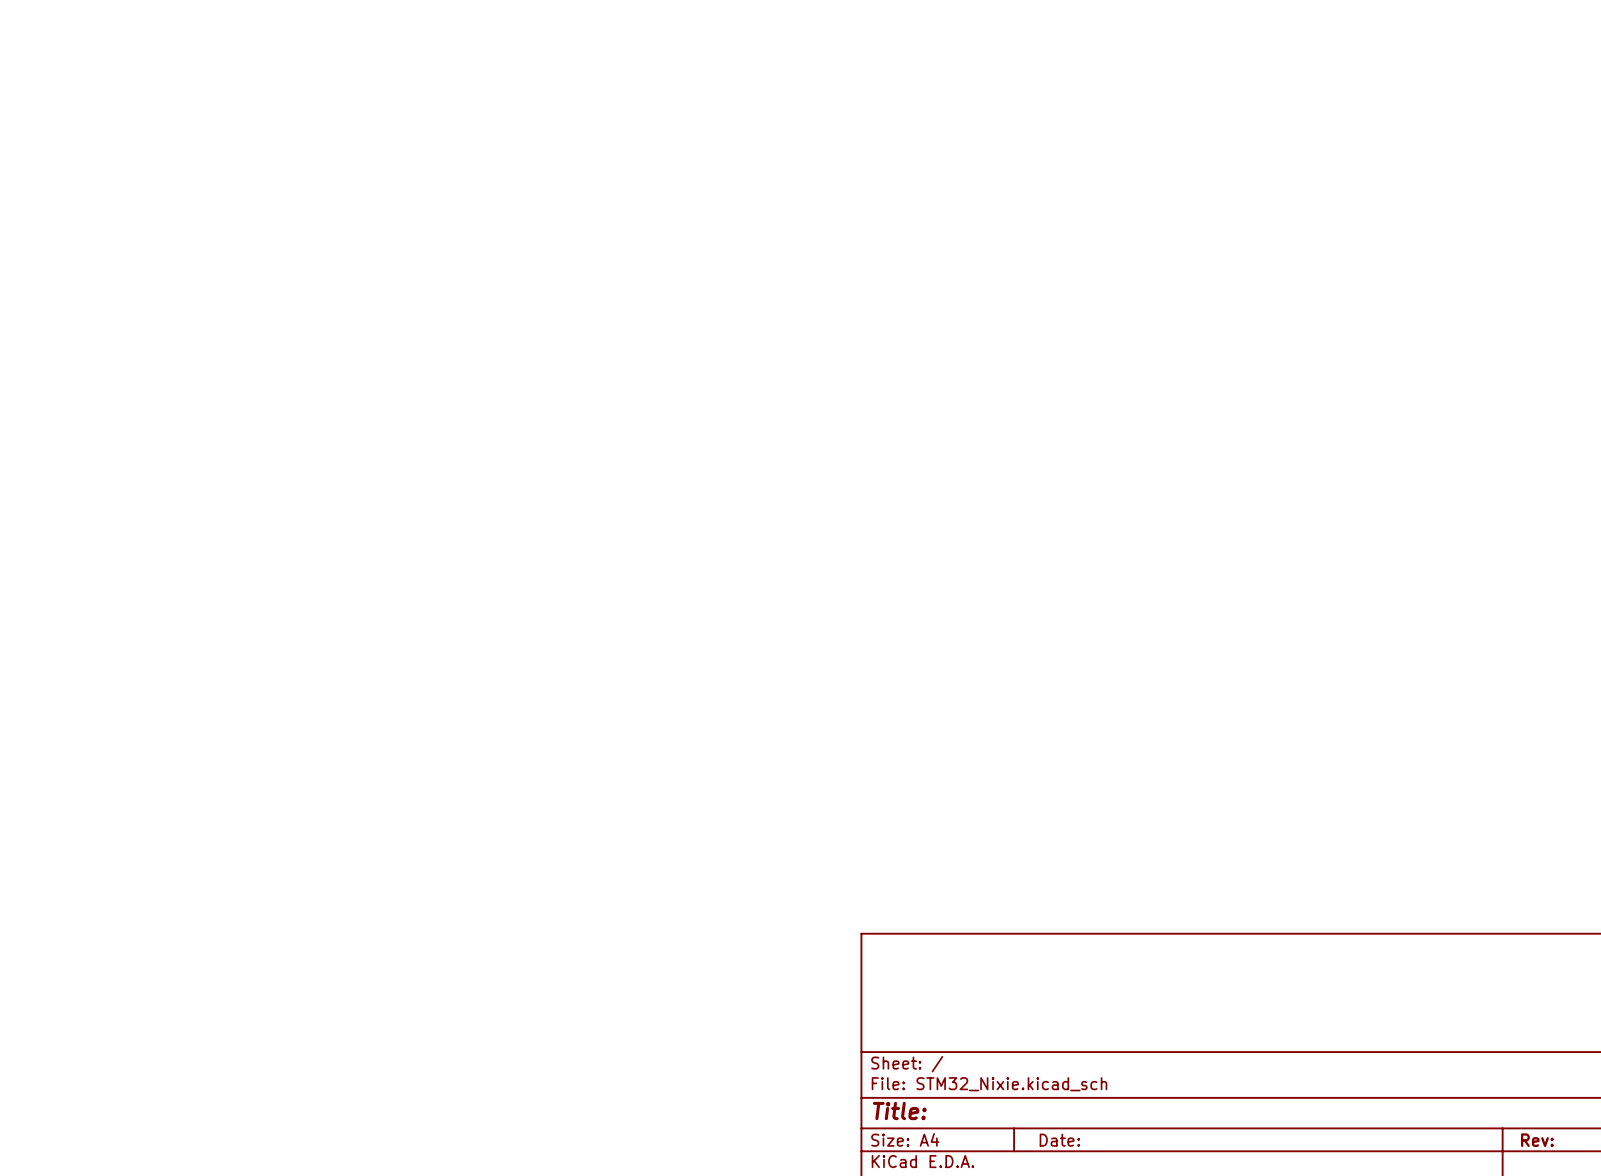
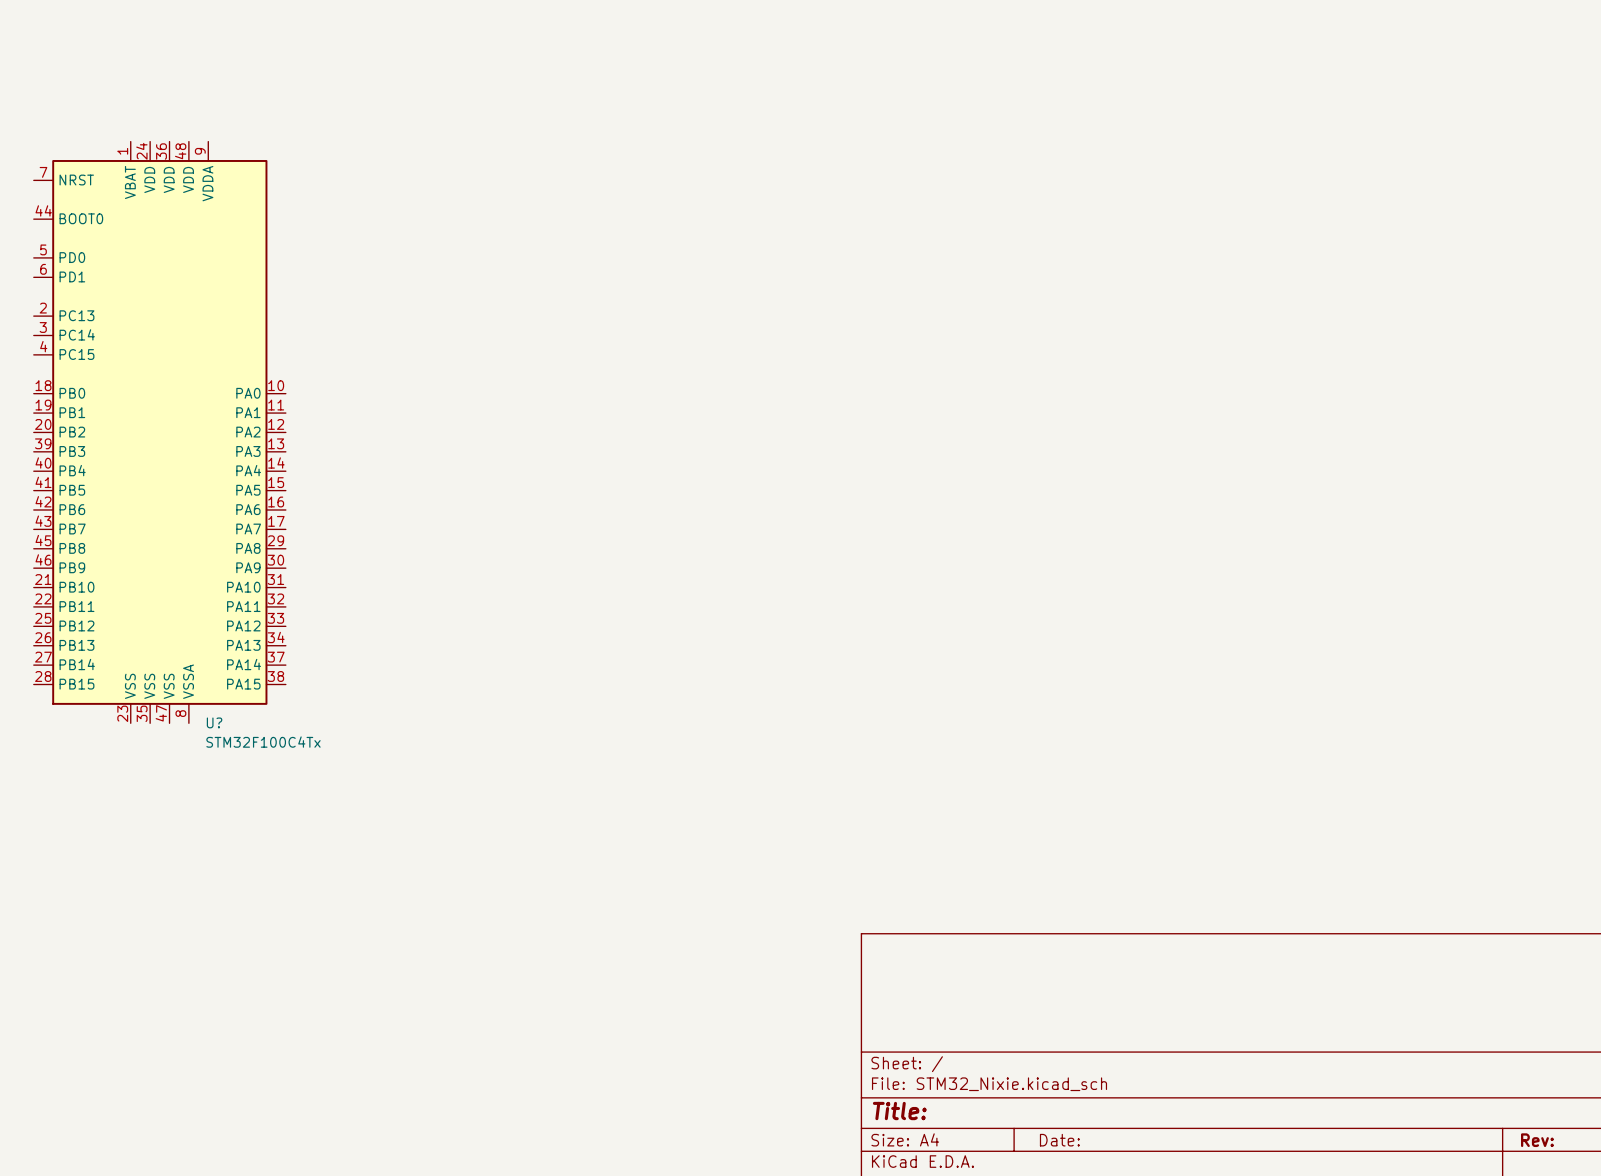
U?: none -> STM32F100C4Tx (159, 432)

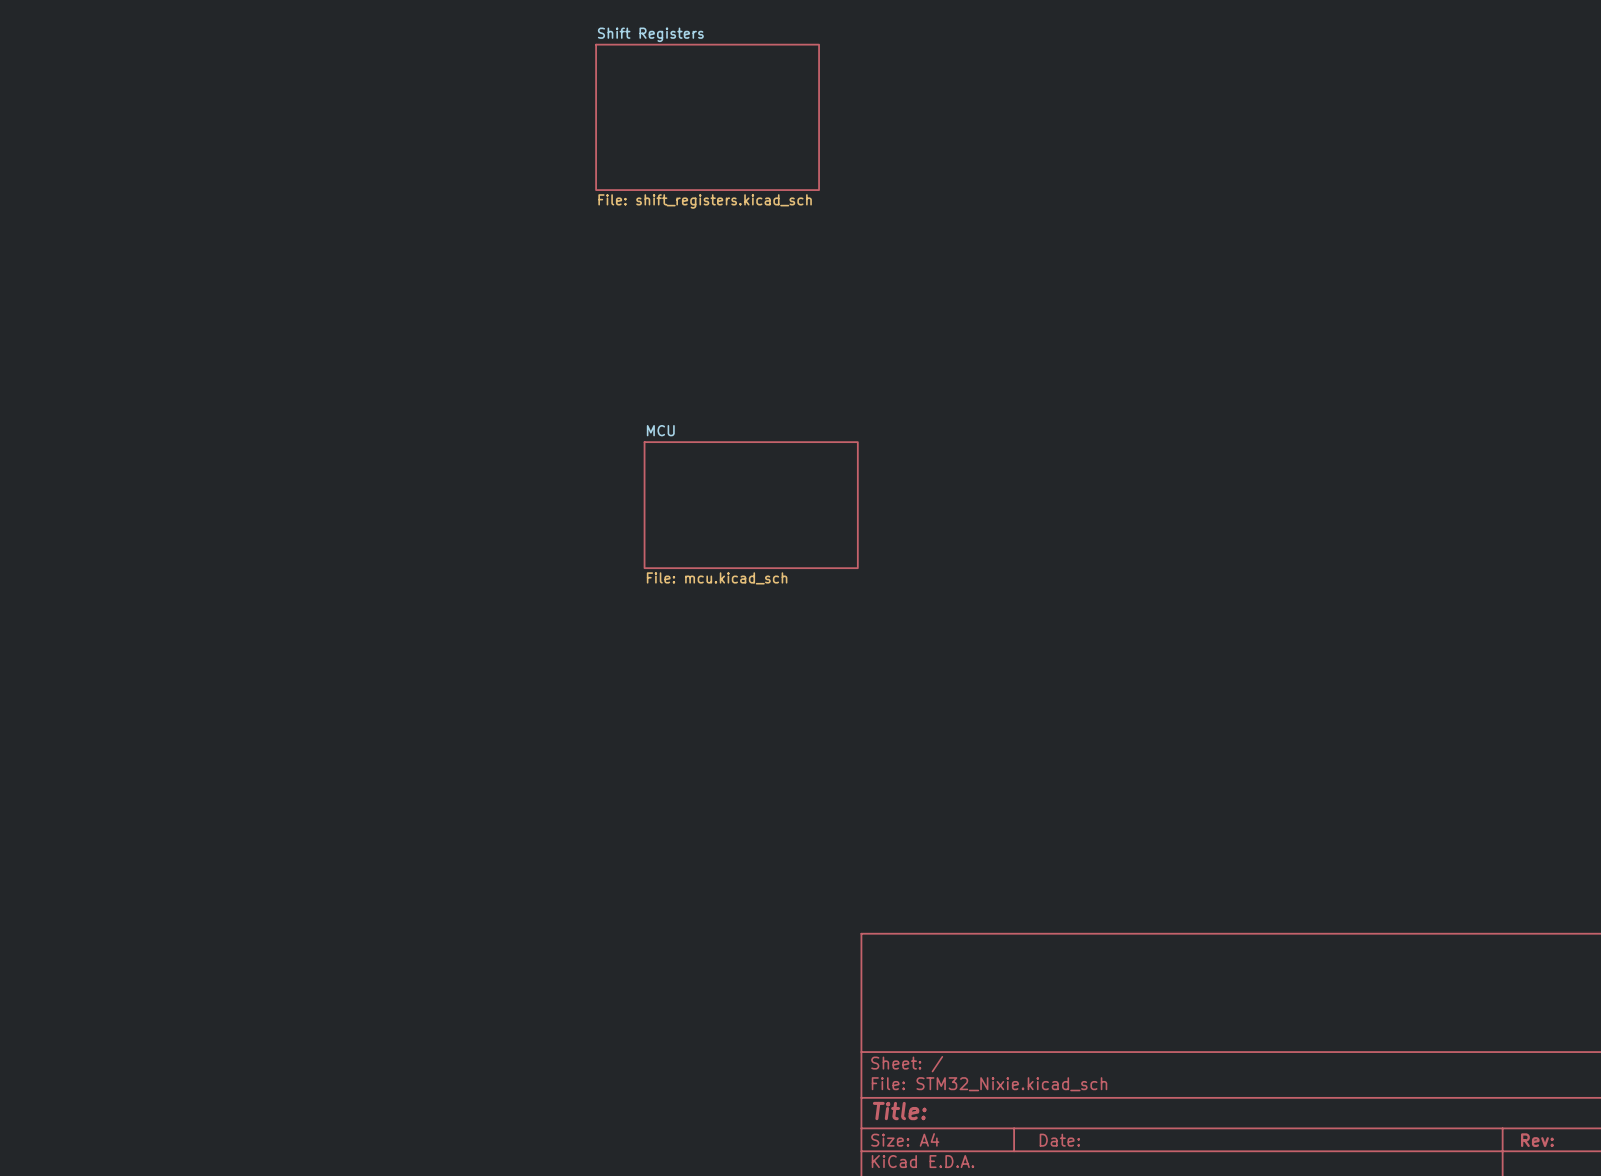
sheet Shift Registers: none -> File: shift_registers.kicad_sch (707, 117)
U?: STM32F100C4Tx (159, 432) -> none
sheet MCU: none -> File: mcu.kicad_sch (751, 505)

